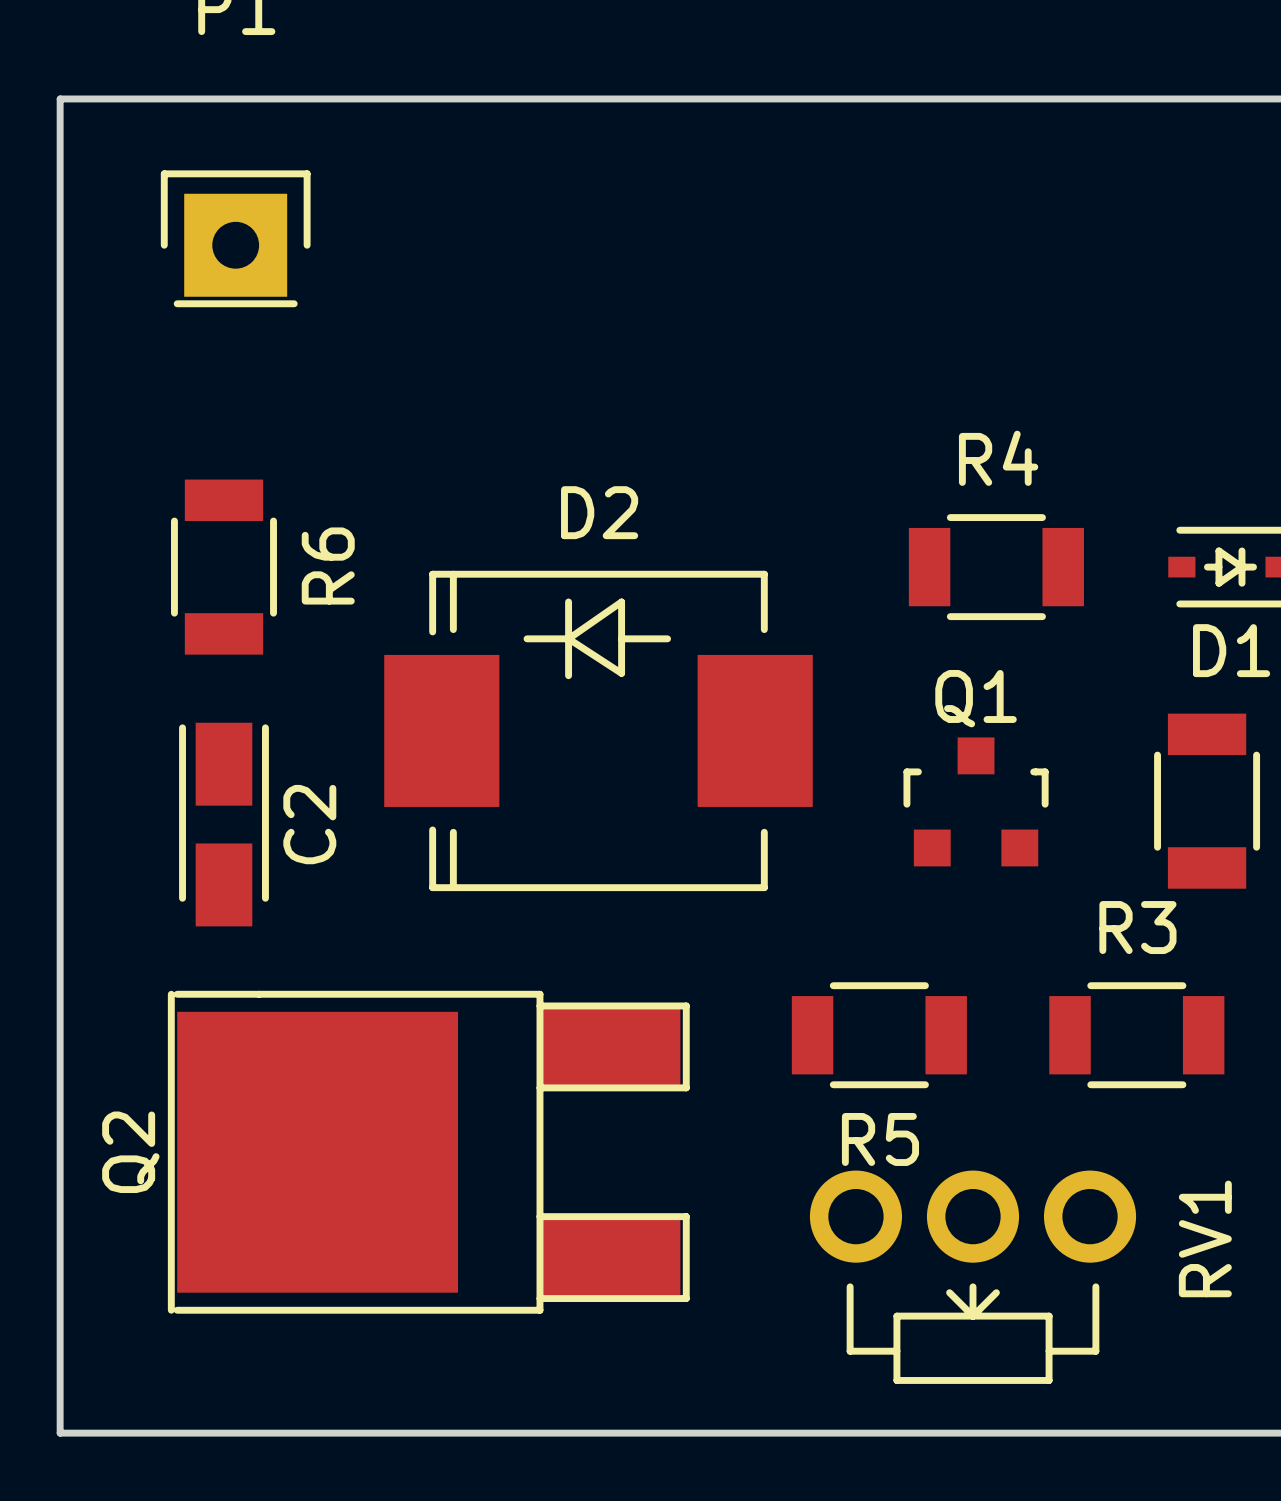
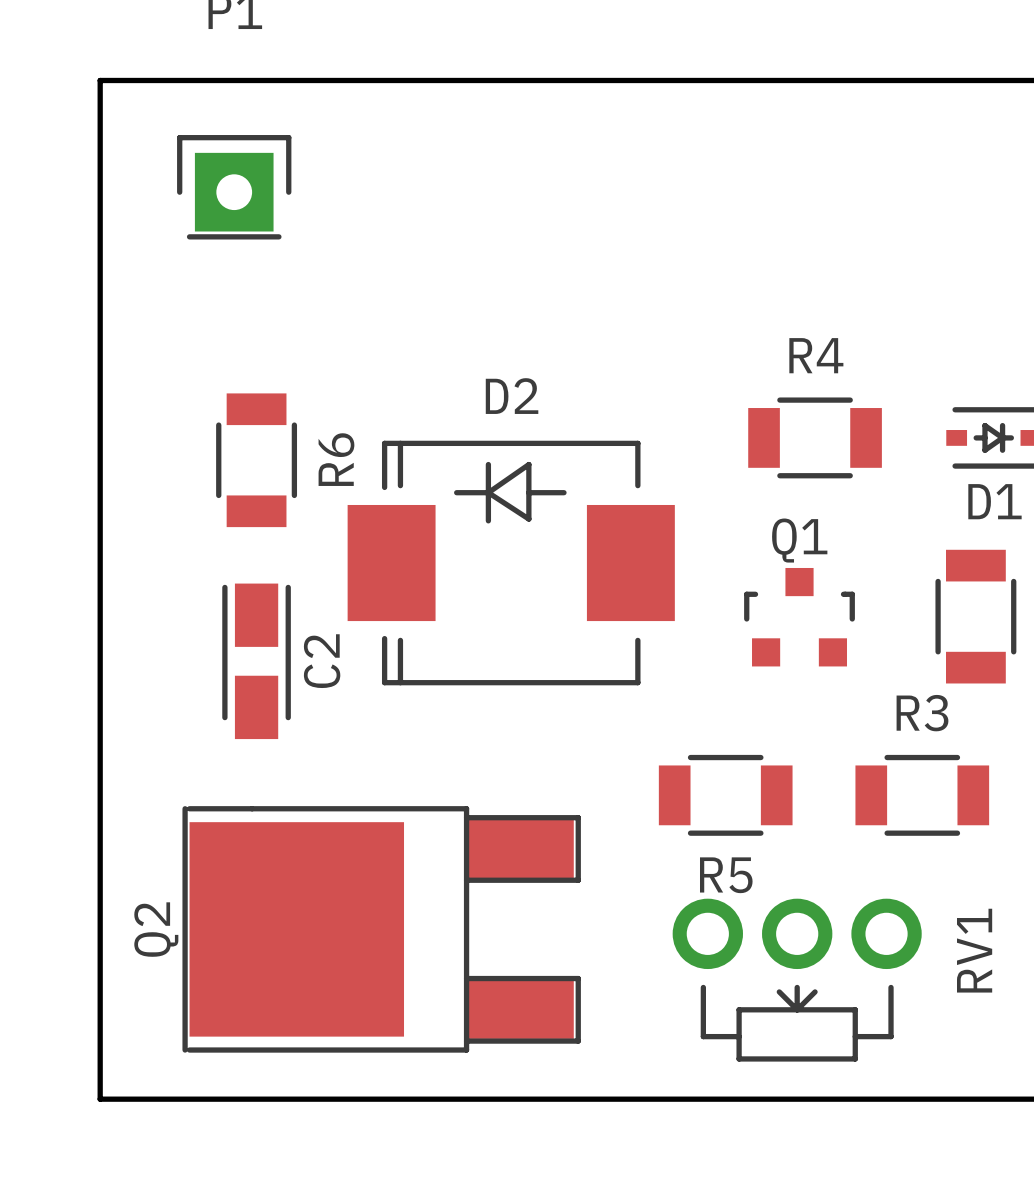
R6 position: (223, 567) -> (256, 460)
C2 position: (223, 824) -> (256, 661)
Q2 position: (428, 1152) -> (381, 929)

